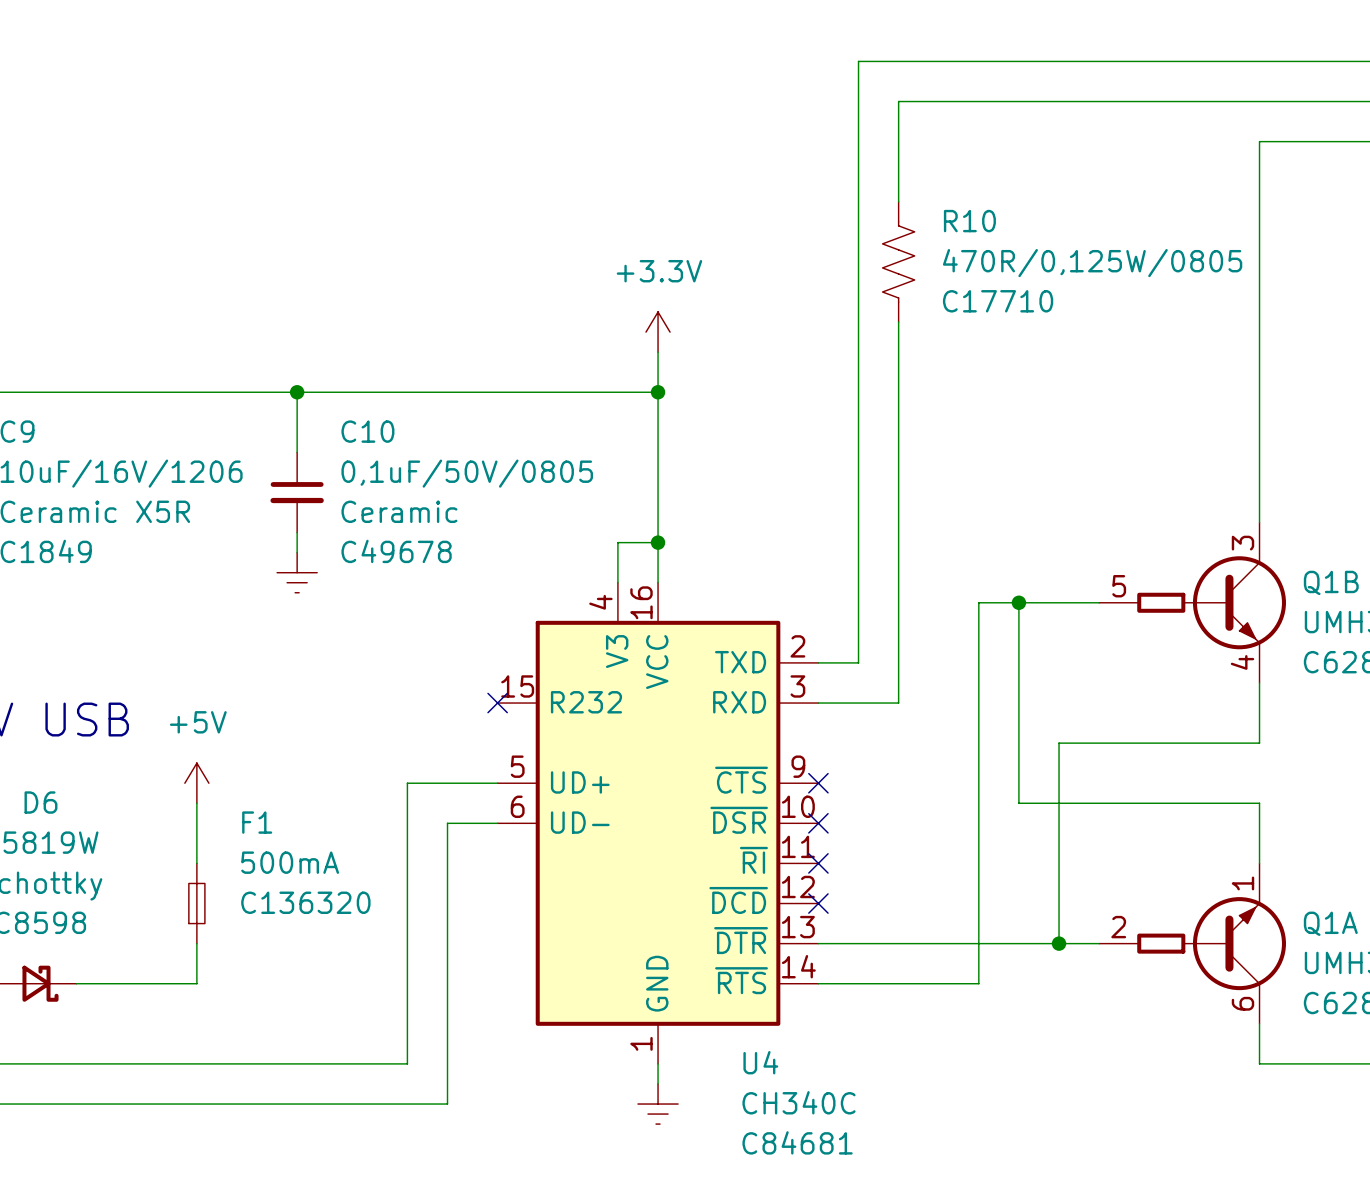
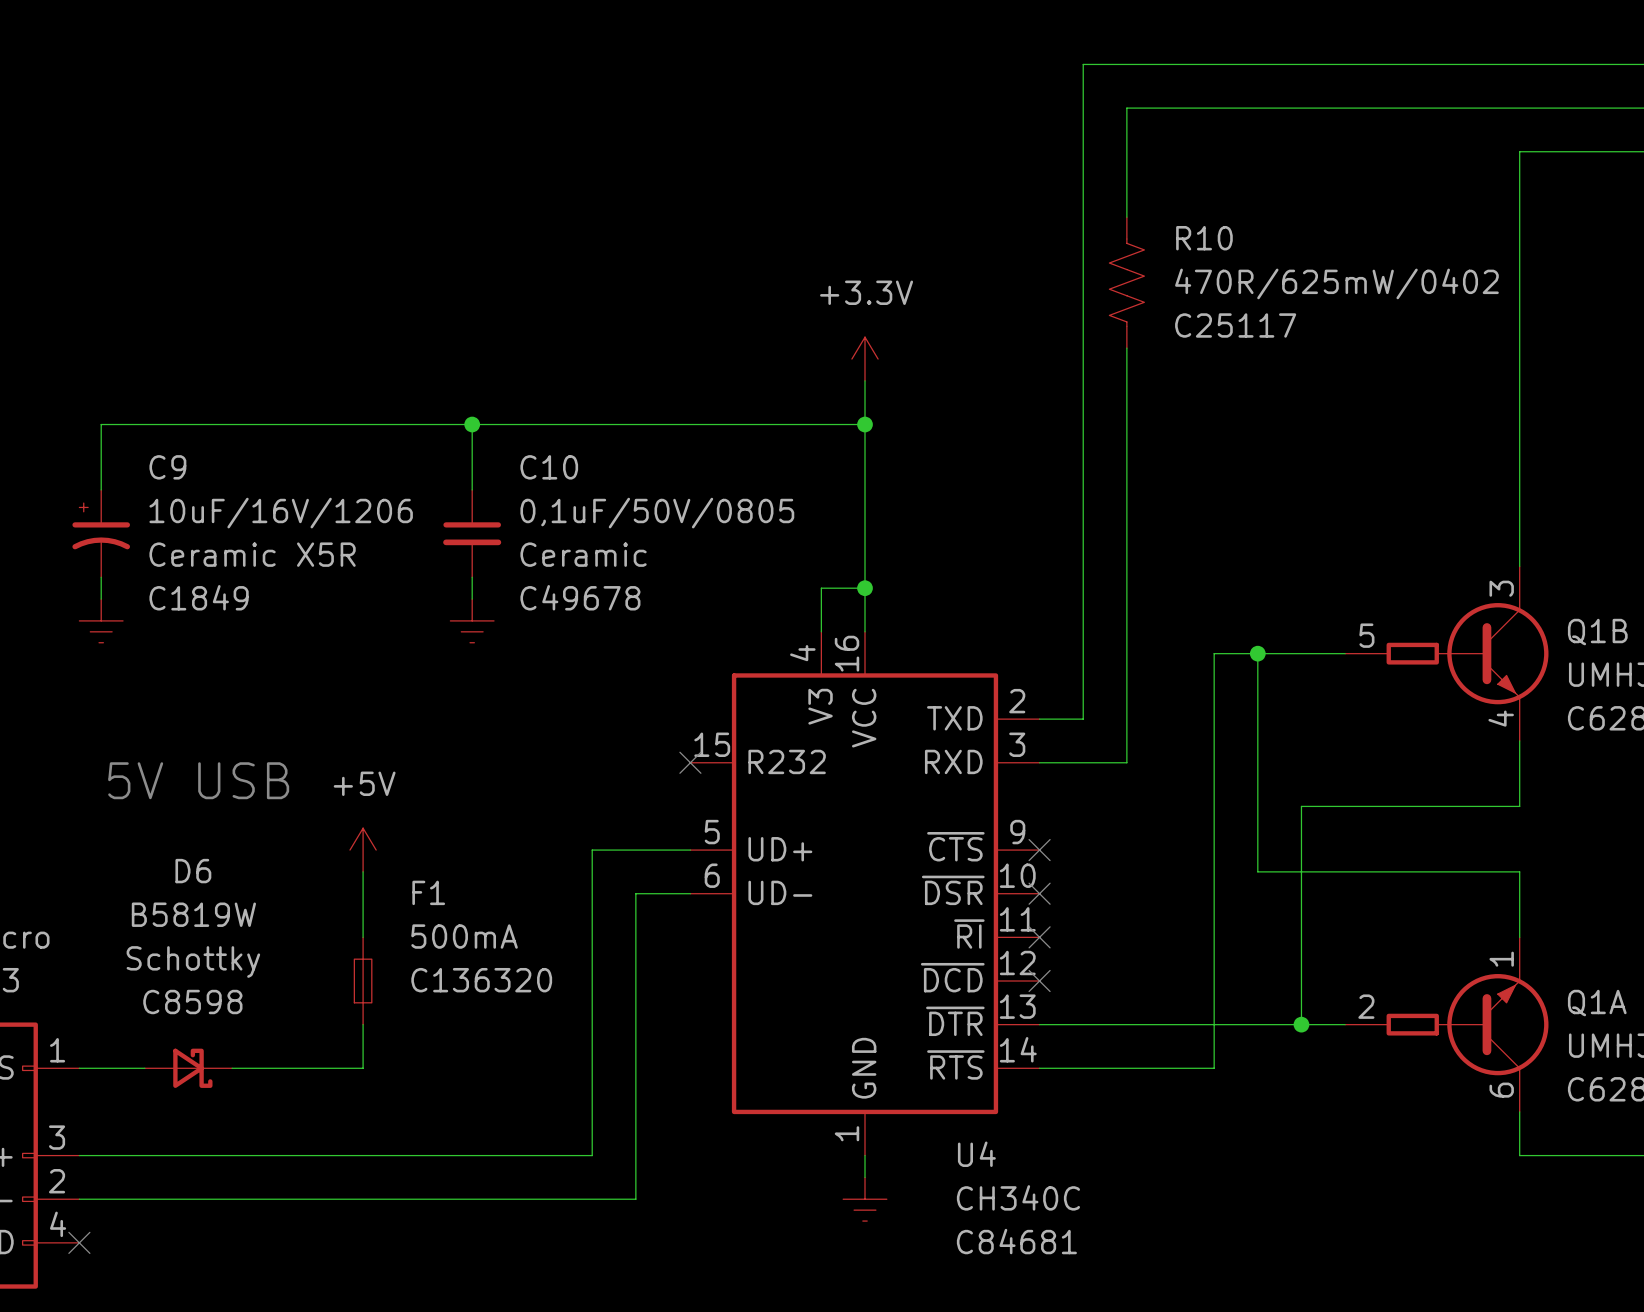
R10 value: 470R/0,125W/0805 (1092, 263) -> 470R/625mW/0402 (1336, 283)
R10 text: C17710 (998, 301) -> C25117 (1235, 325)

